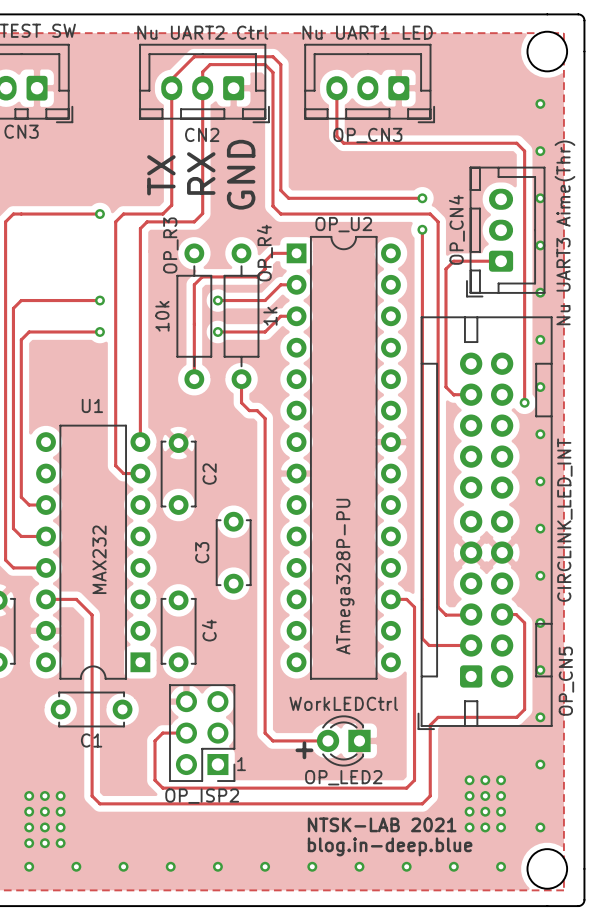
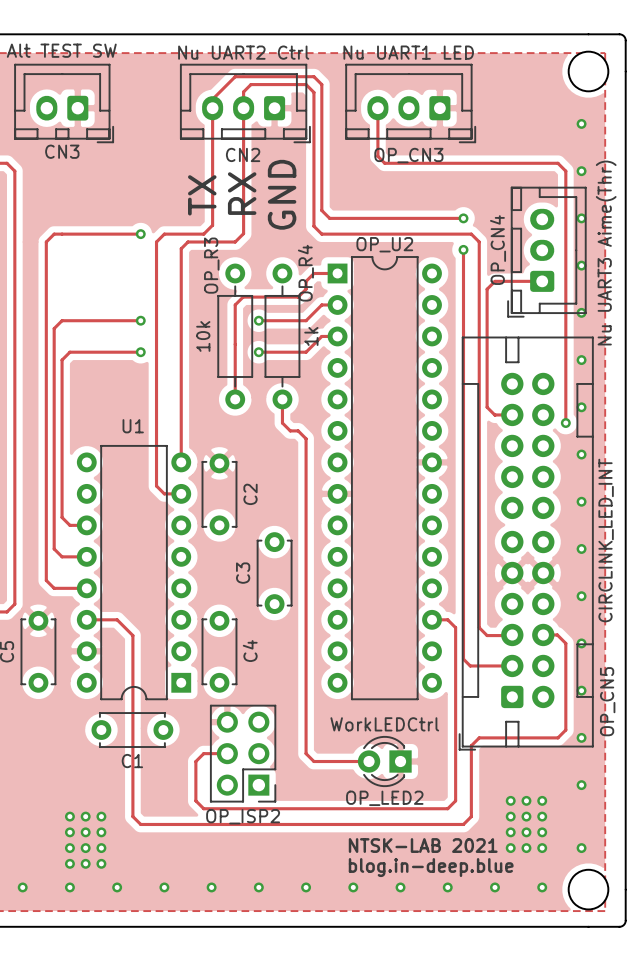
U1 value: MAX232 (99, 559) -> none
OP_U2 value: ATmega328P-PU (345, 576) -> none
text: + (304, 750) -> none
text: 1 (241, 764) -> none

